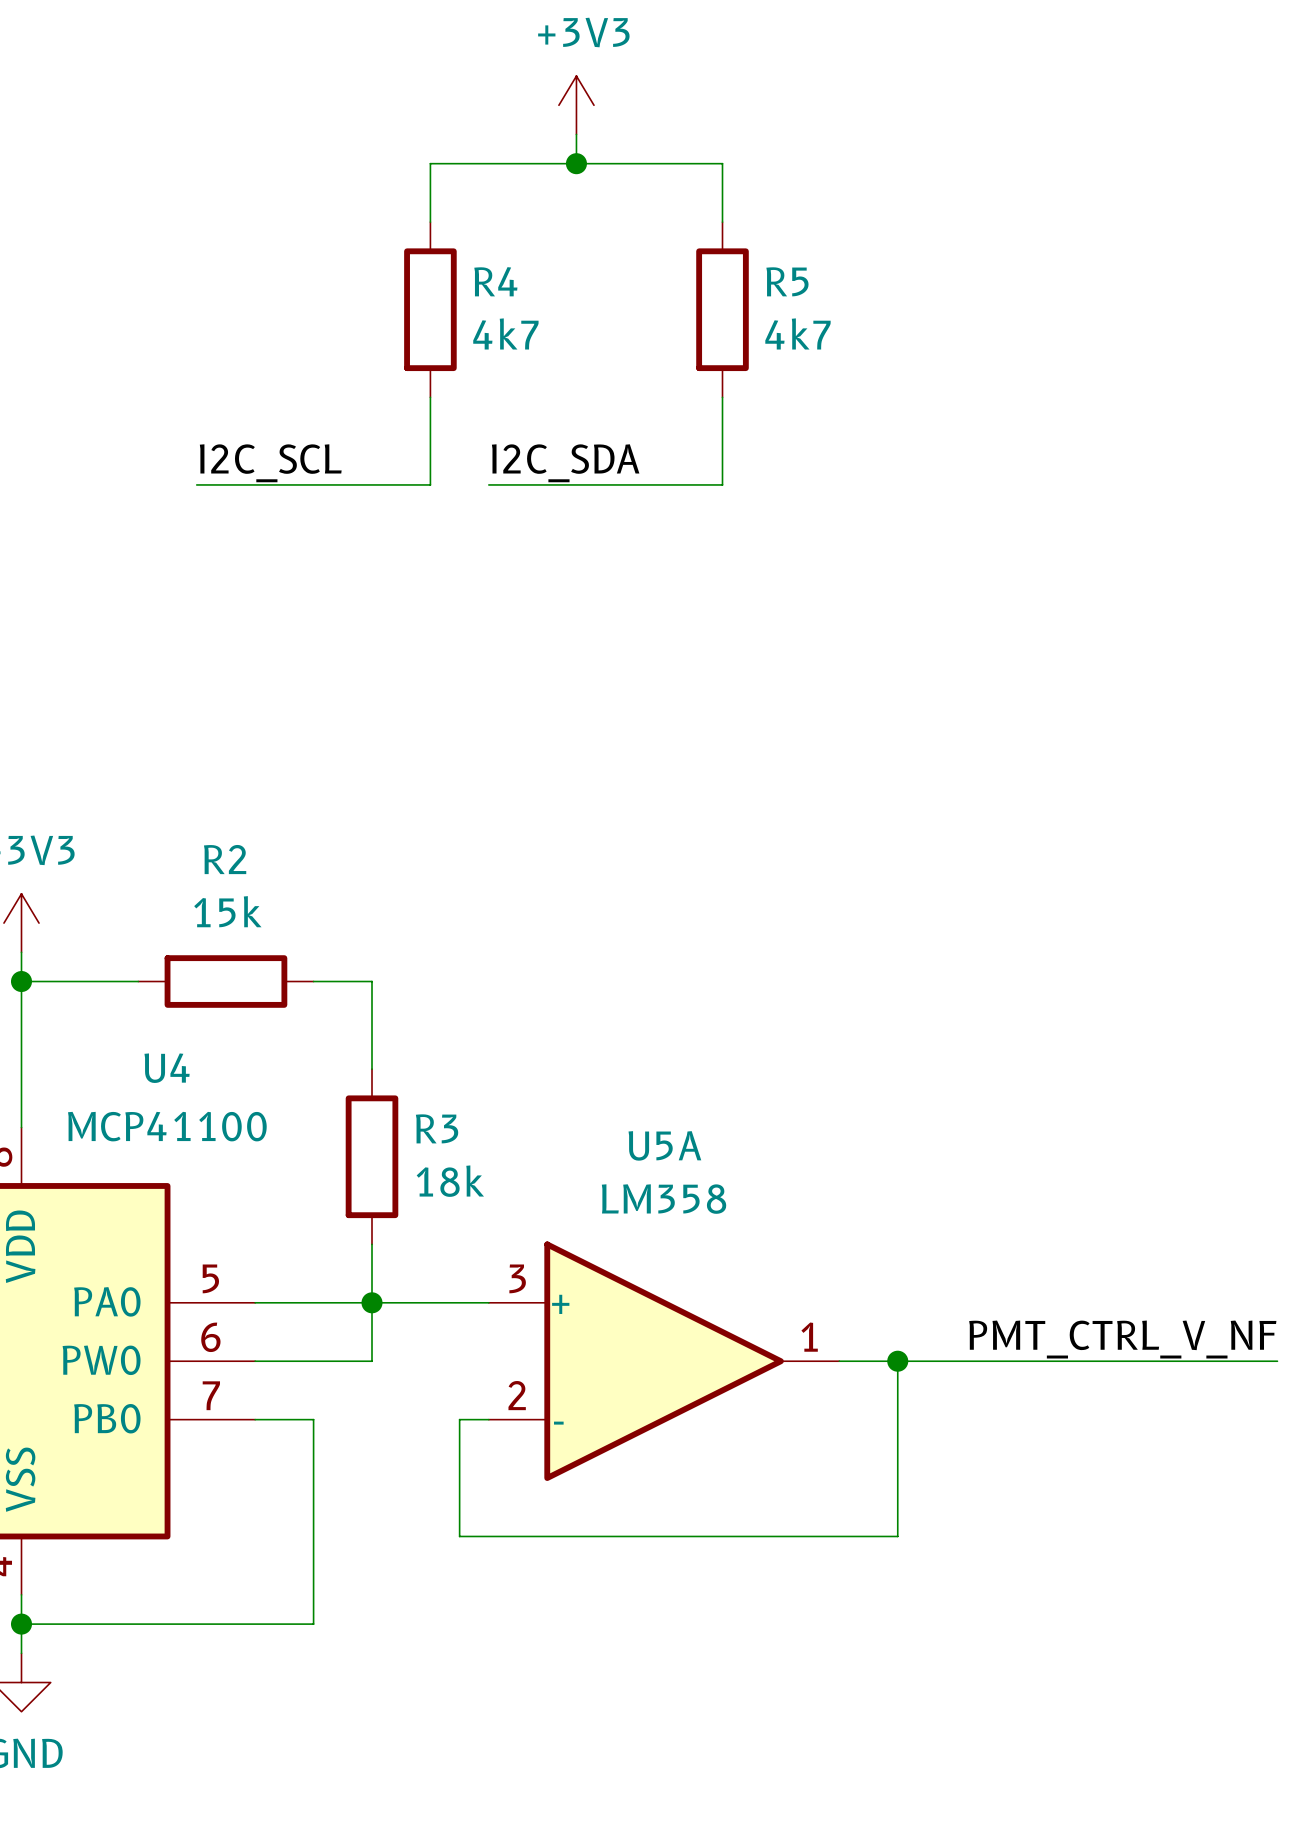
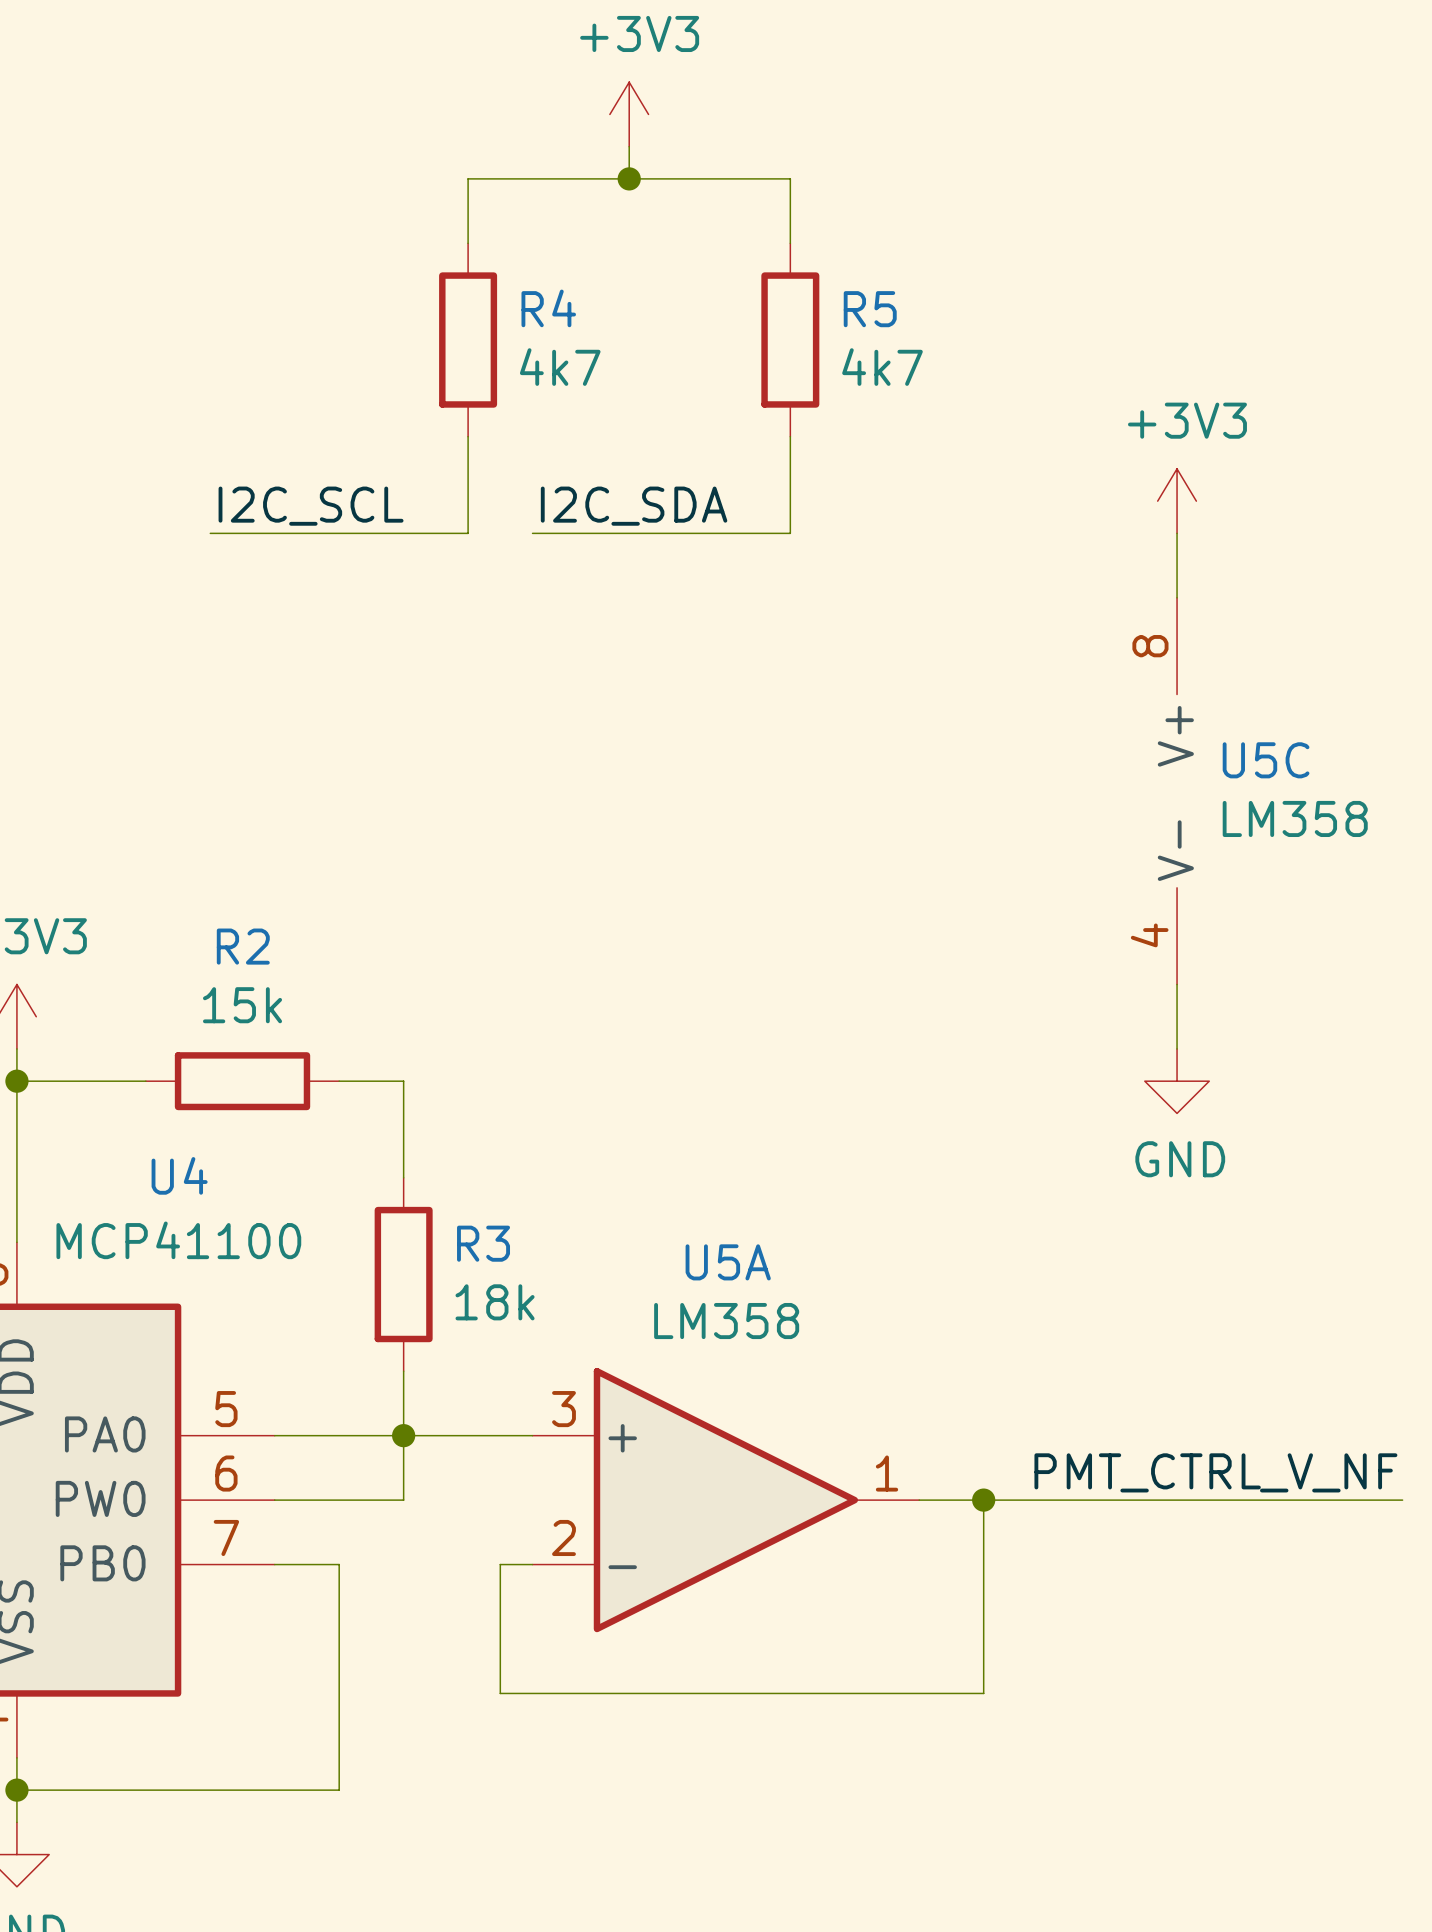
power symbol: none -> +3V3 (1177, 501)
wire: none -> (1177, 533) (1177, 597)
U5C: none -> LM358 (1177, 791)
wire: none -> (1177, 984) (1177, 1048)
power symbol: none -> GND (1177, 1081)

